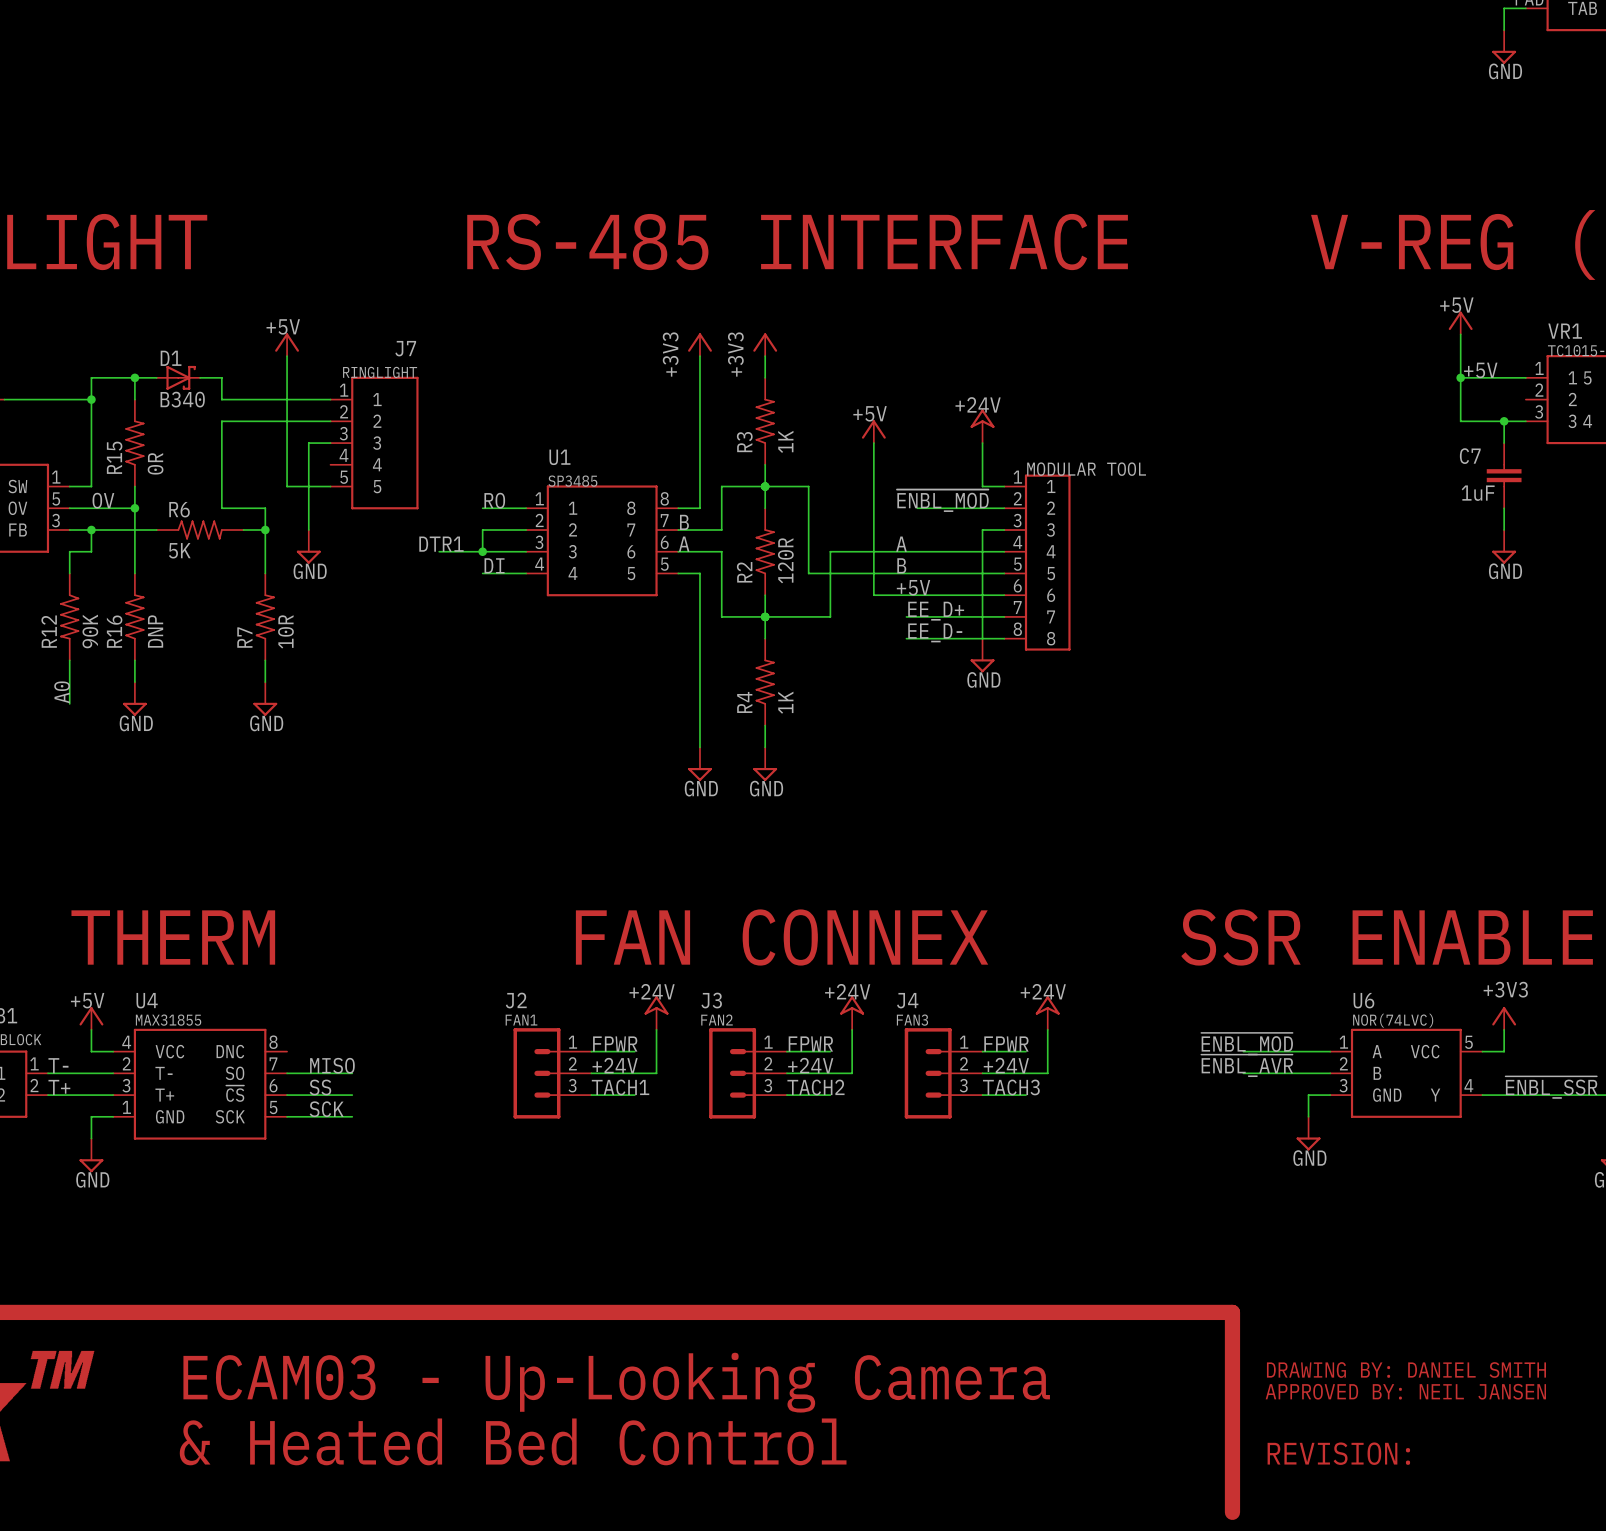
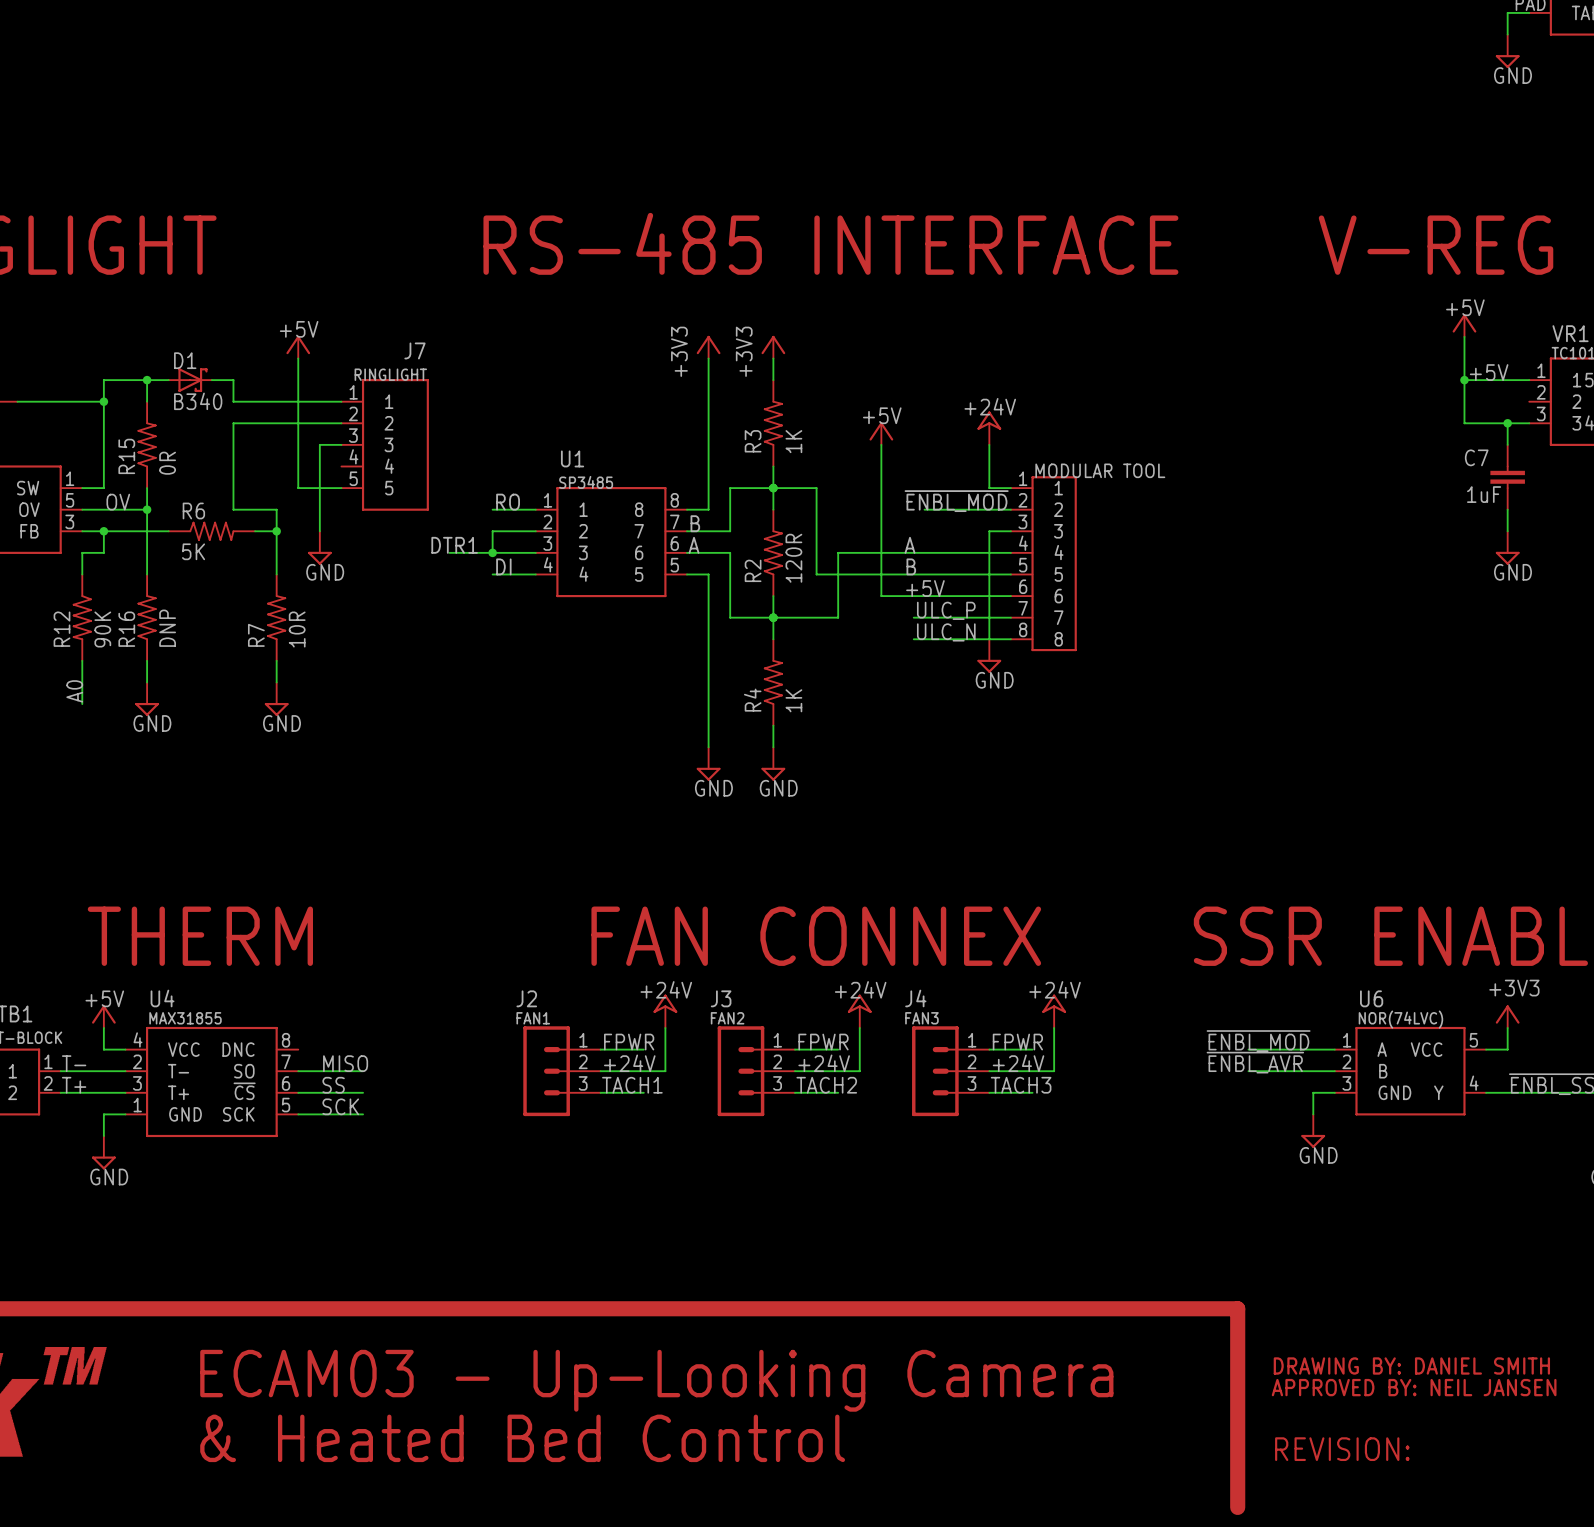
label: EE_D+ (936, 611) -> ULC_P (946, 610)
label: EE_D- (935, 632) -> ULC_N (946, 632)

